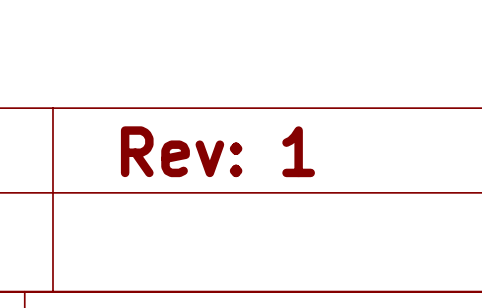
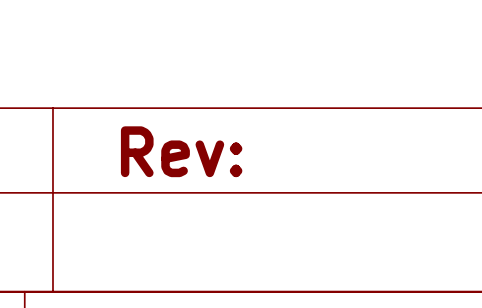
title block: Rev: 1 (217, 151) -> Rev: (181, 151)

